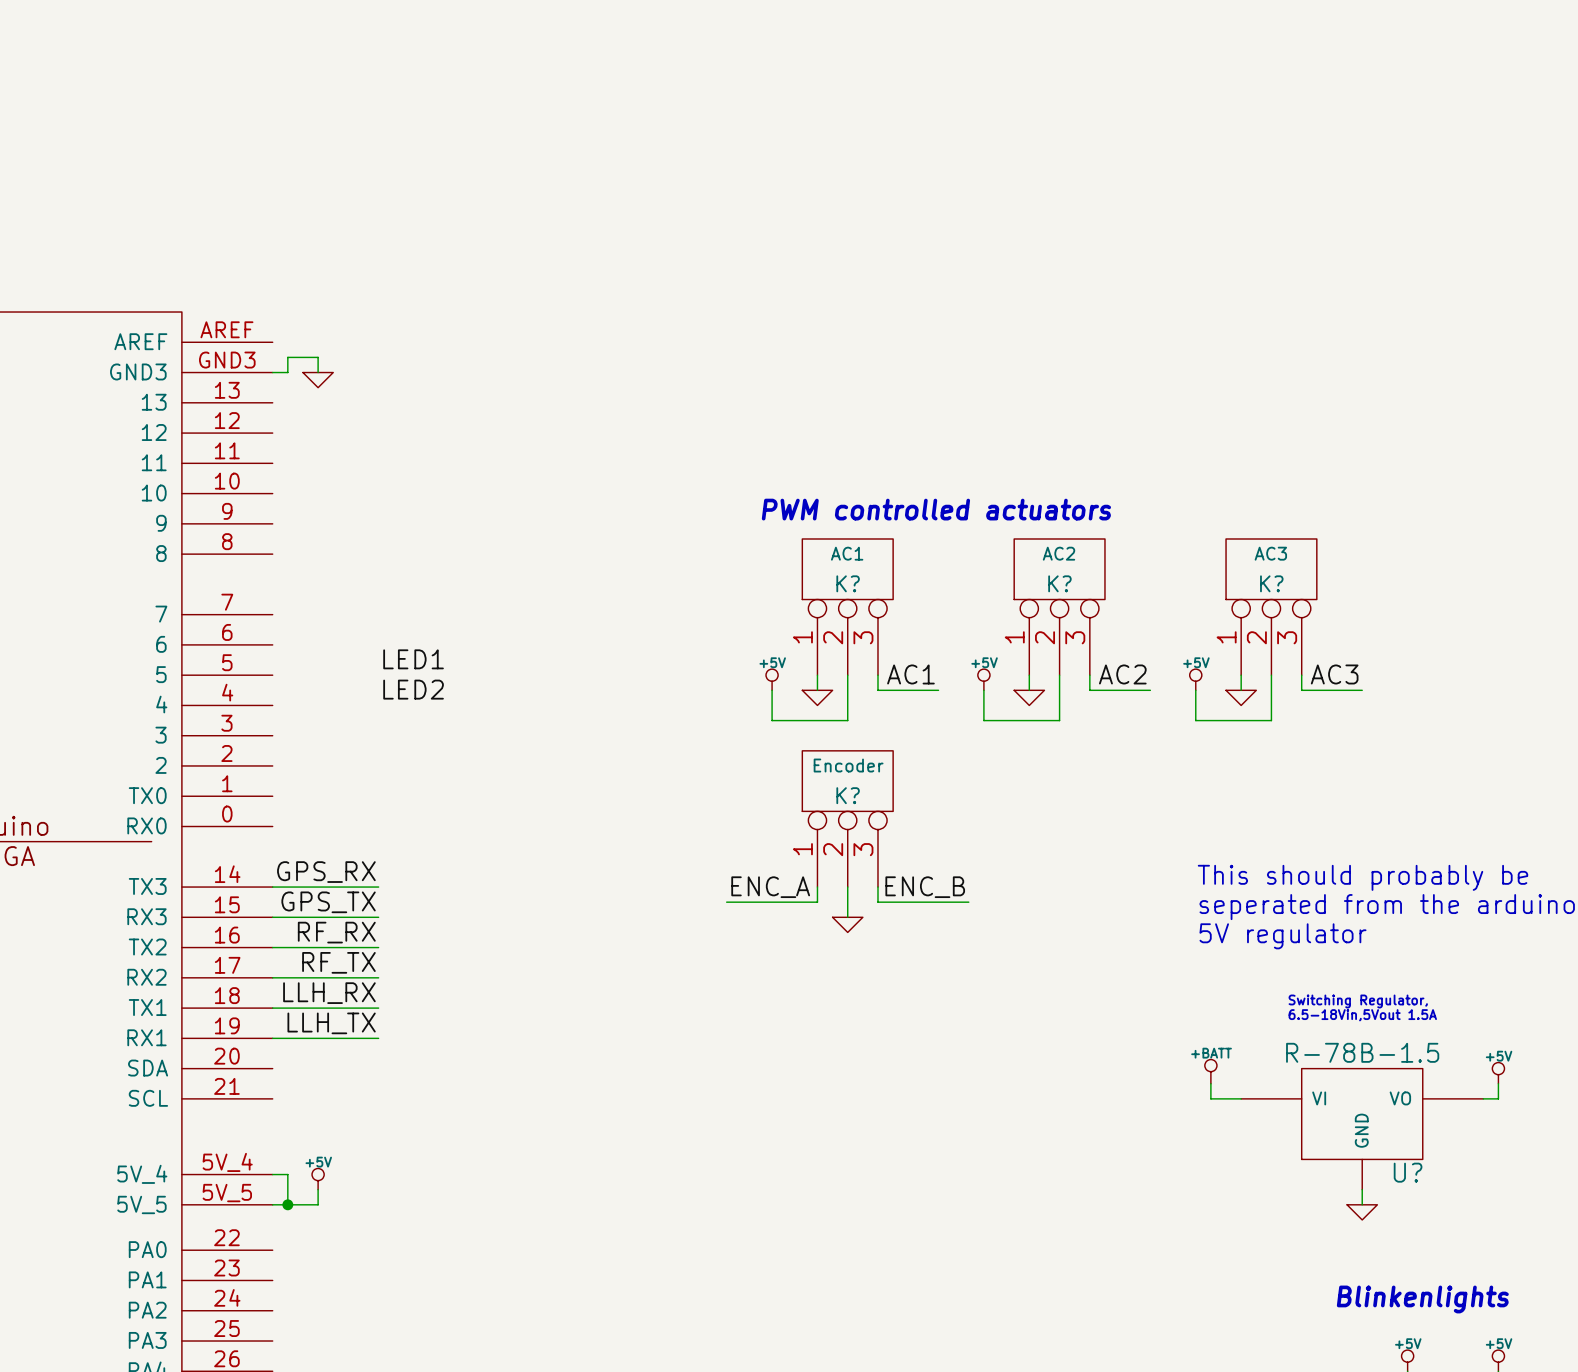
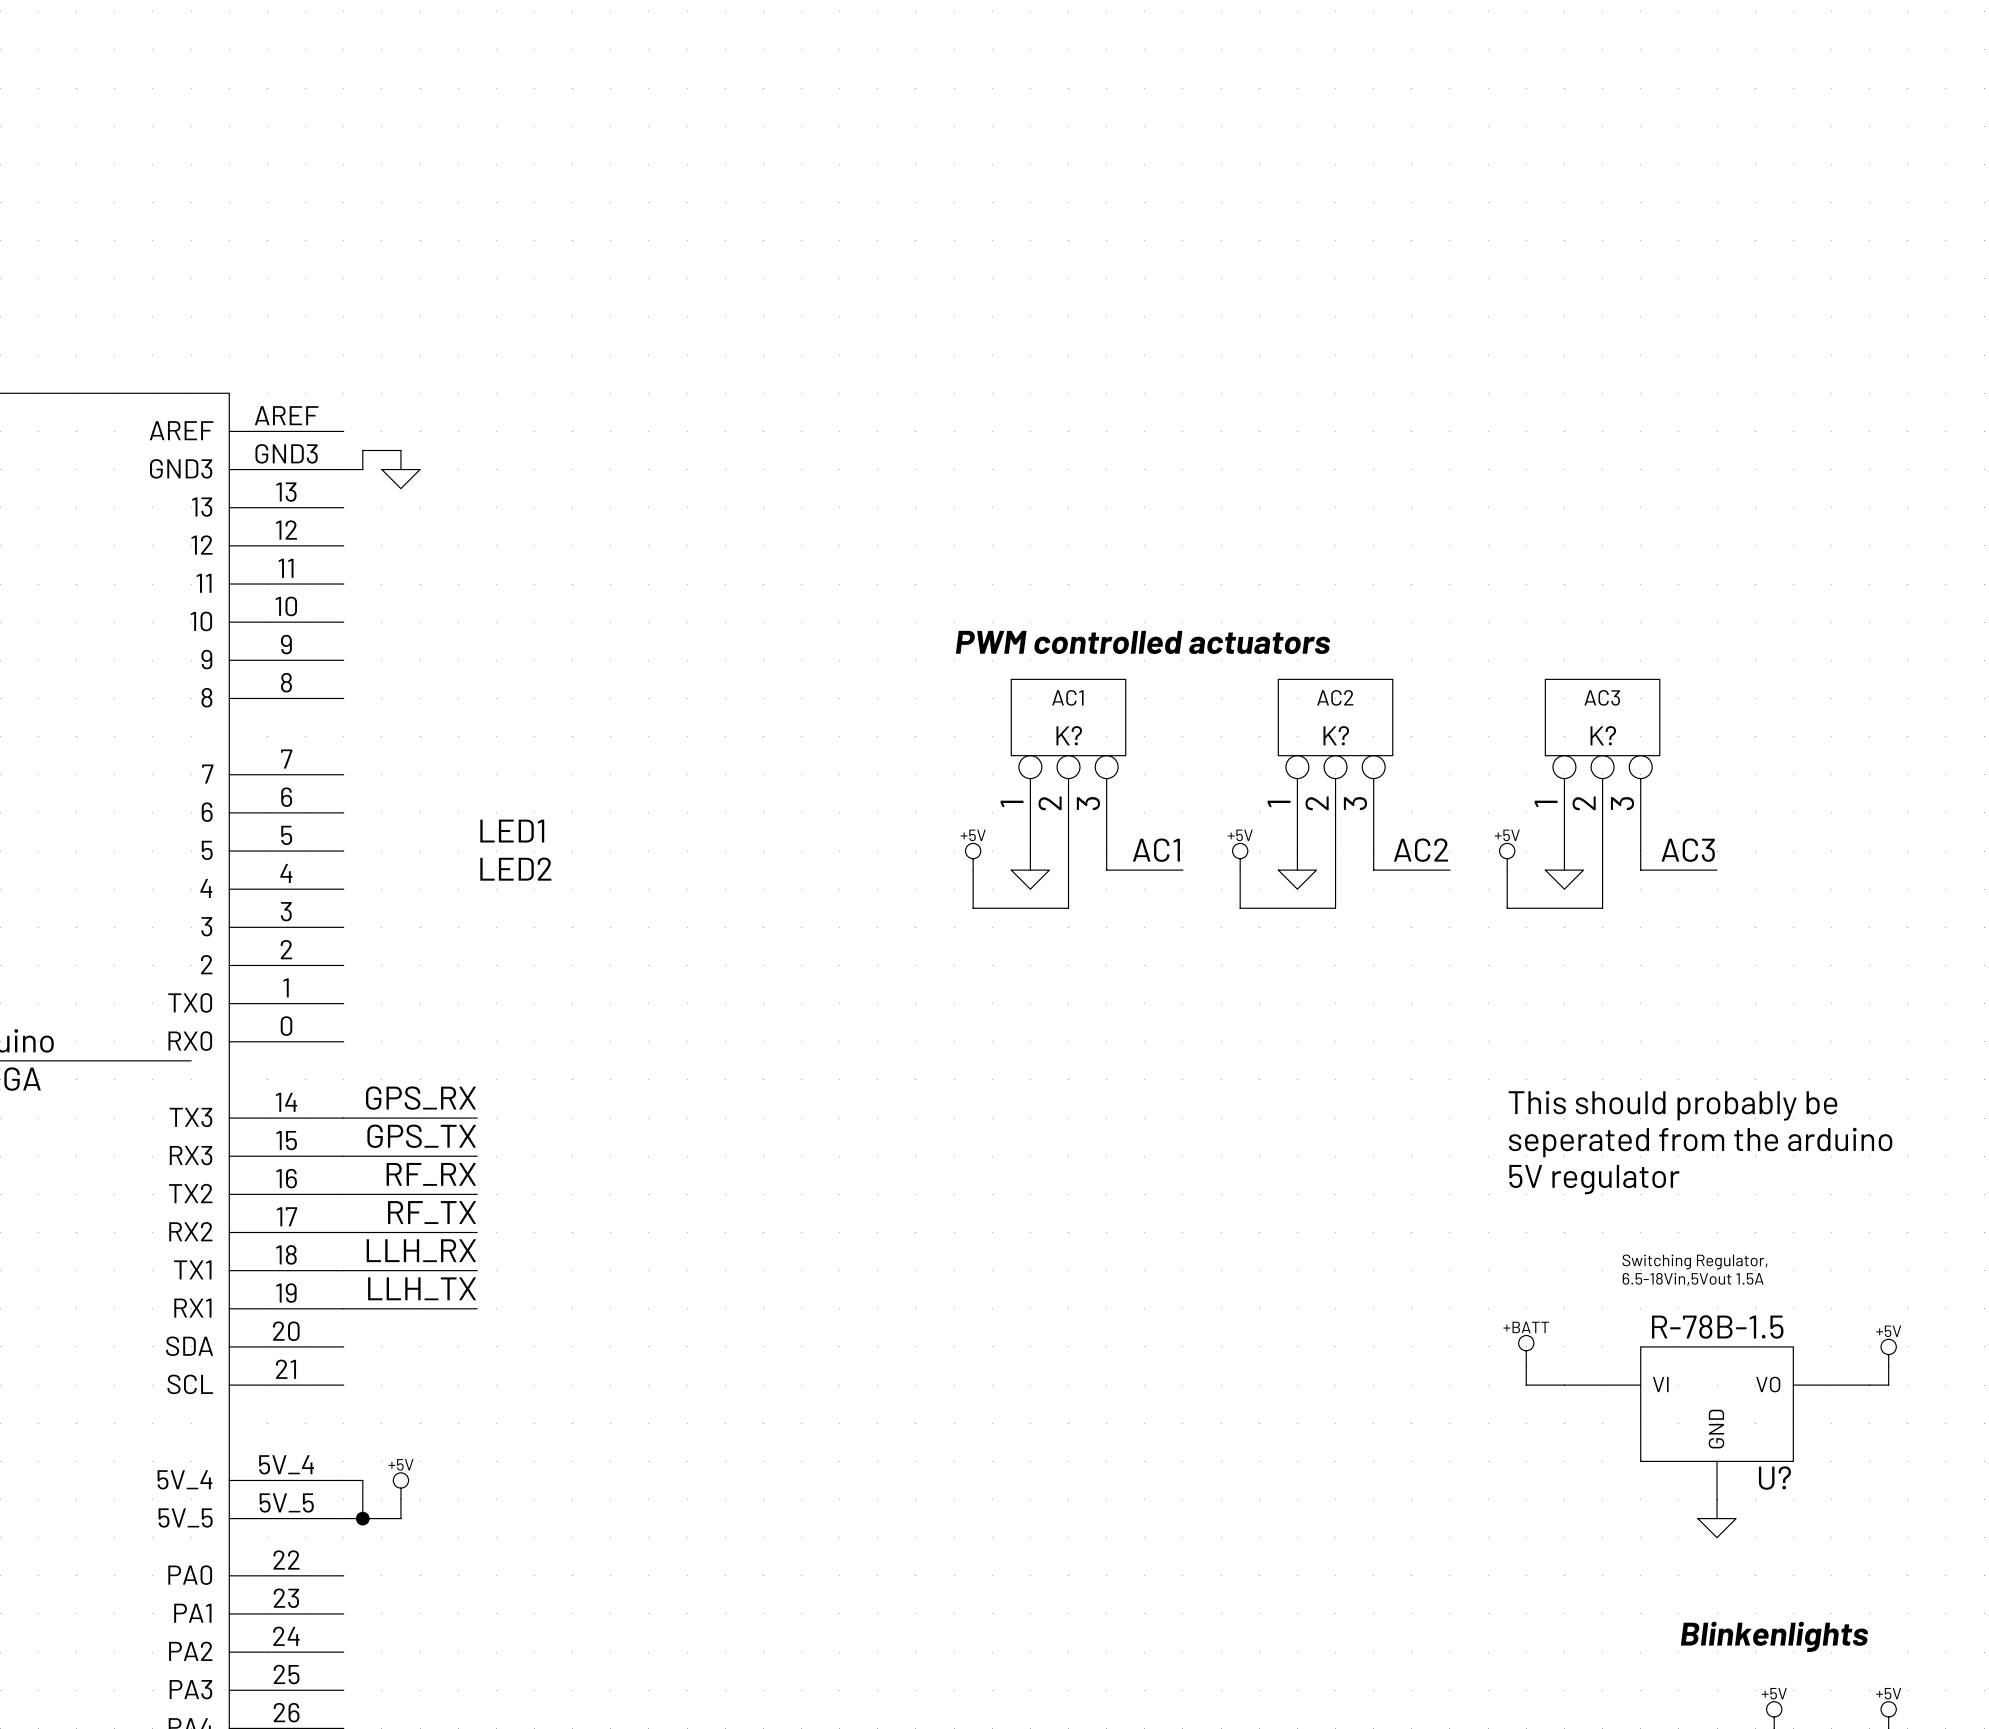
K?: Encoder (847, 818) -> none
label: ENC_A (770, 887) -> none
wire: (817, 887) (817, 902) (726, 902) -> none
wire: (847, 887) (847, 917) -> none
wire: (877, 887) (877, 902) (968, 902) -> none
label: ENC_B (925, 887) -> none
power symbol: (847, 924) -> none

